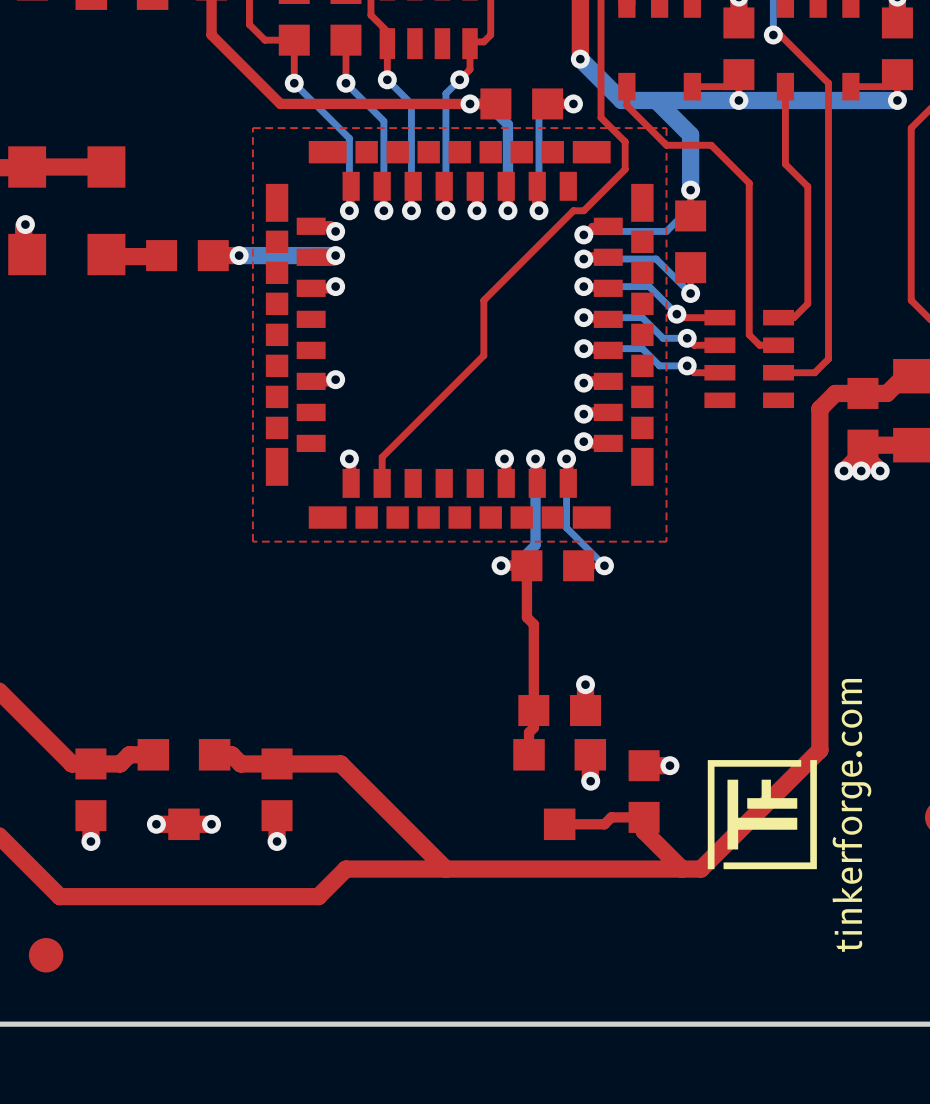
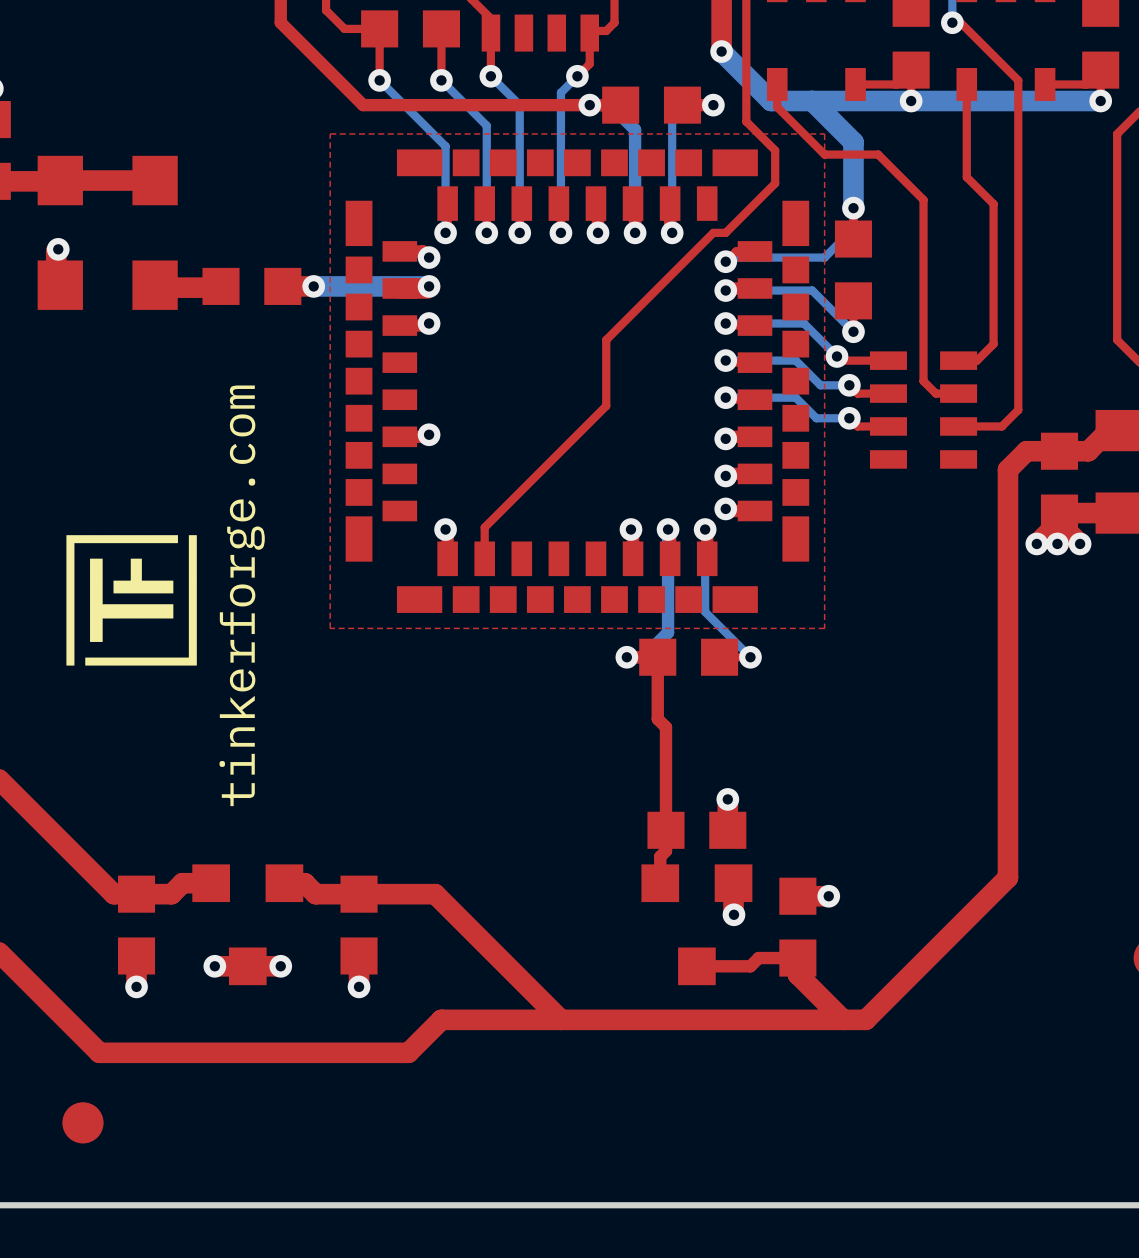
drawing position: (762, 814) -> (131, 600)
text position: tinkerforge.com (851, 815) -> tinkerforge.com (242, 595)

